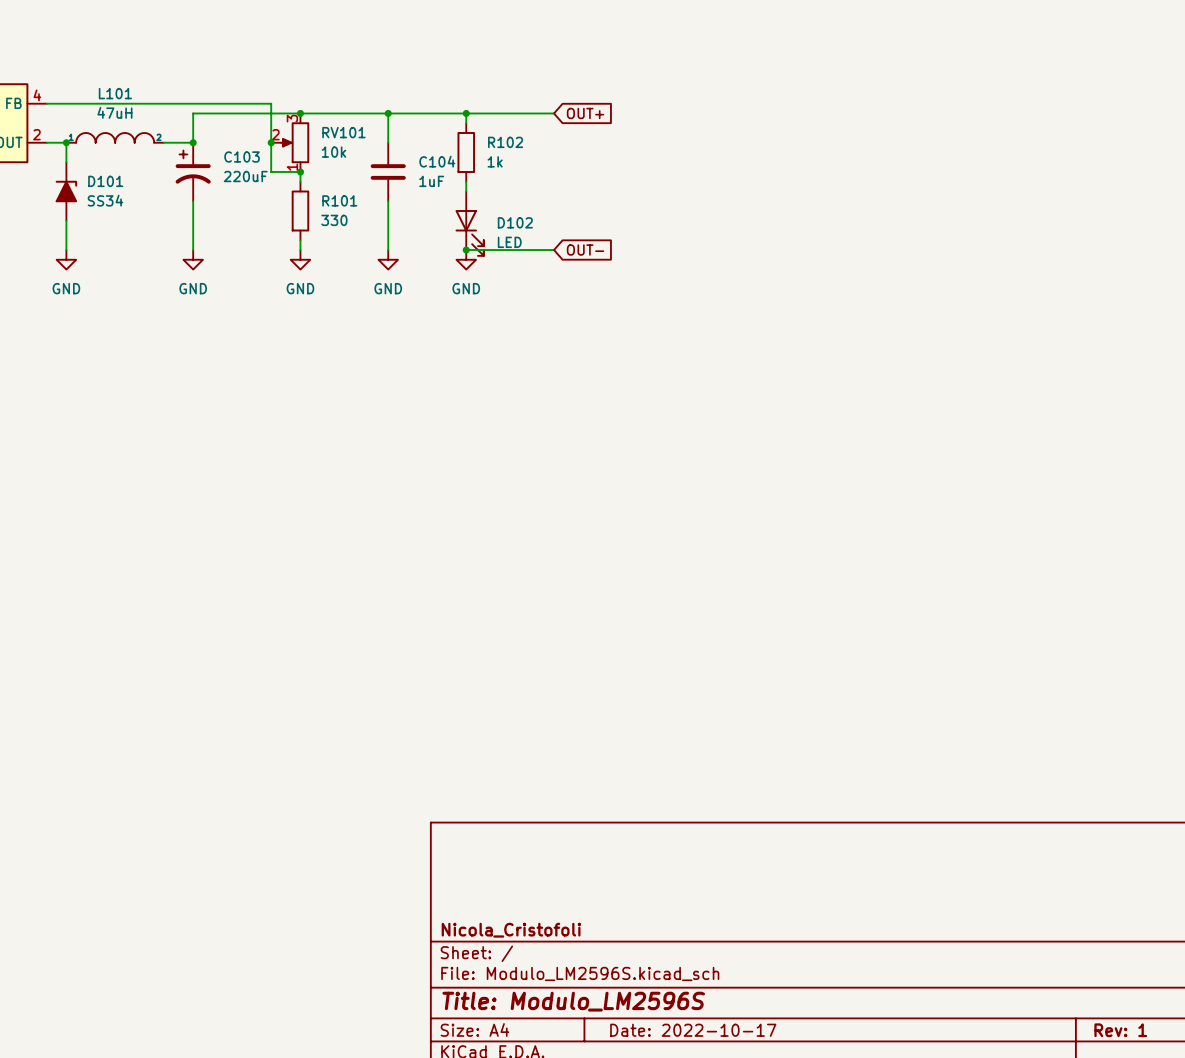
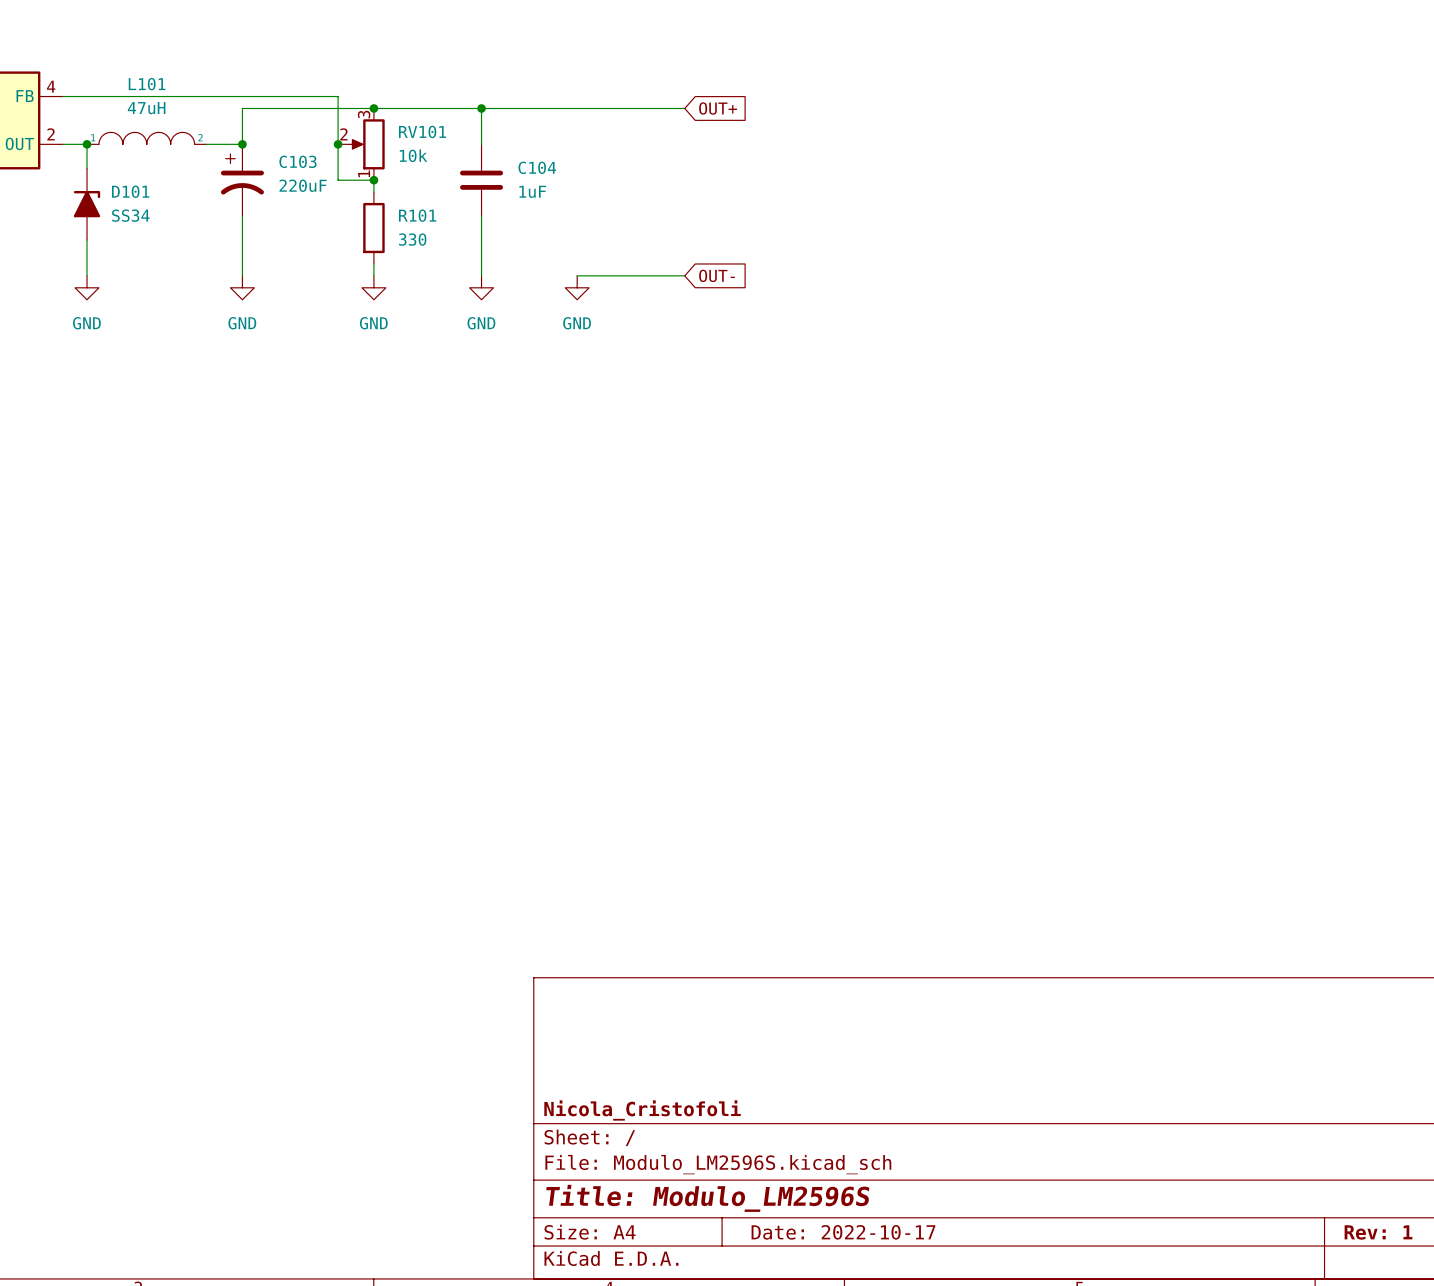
wire: (466, 113) (466, 123) -> none
junction: (466, 113) -> none
R102: 1k (466, 152) -> none
wire: (466, 181) (466, 191) -> none
D102: LED (469, 223) -> none
junction: (466, 250) -> none

